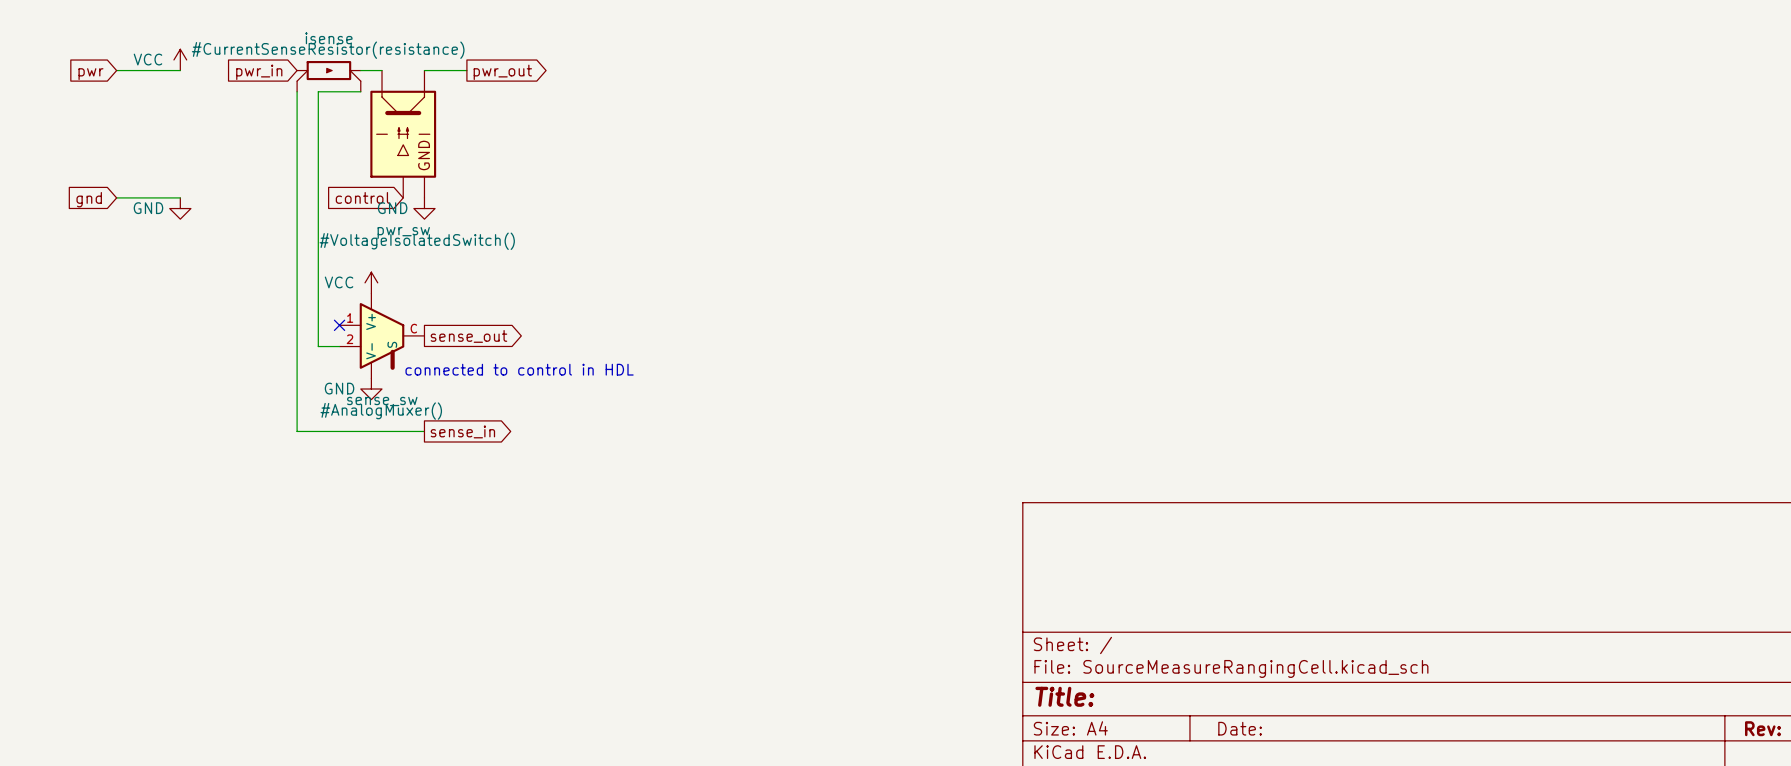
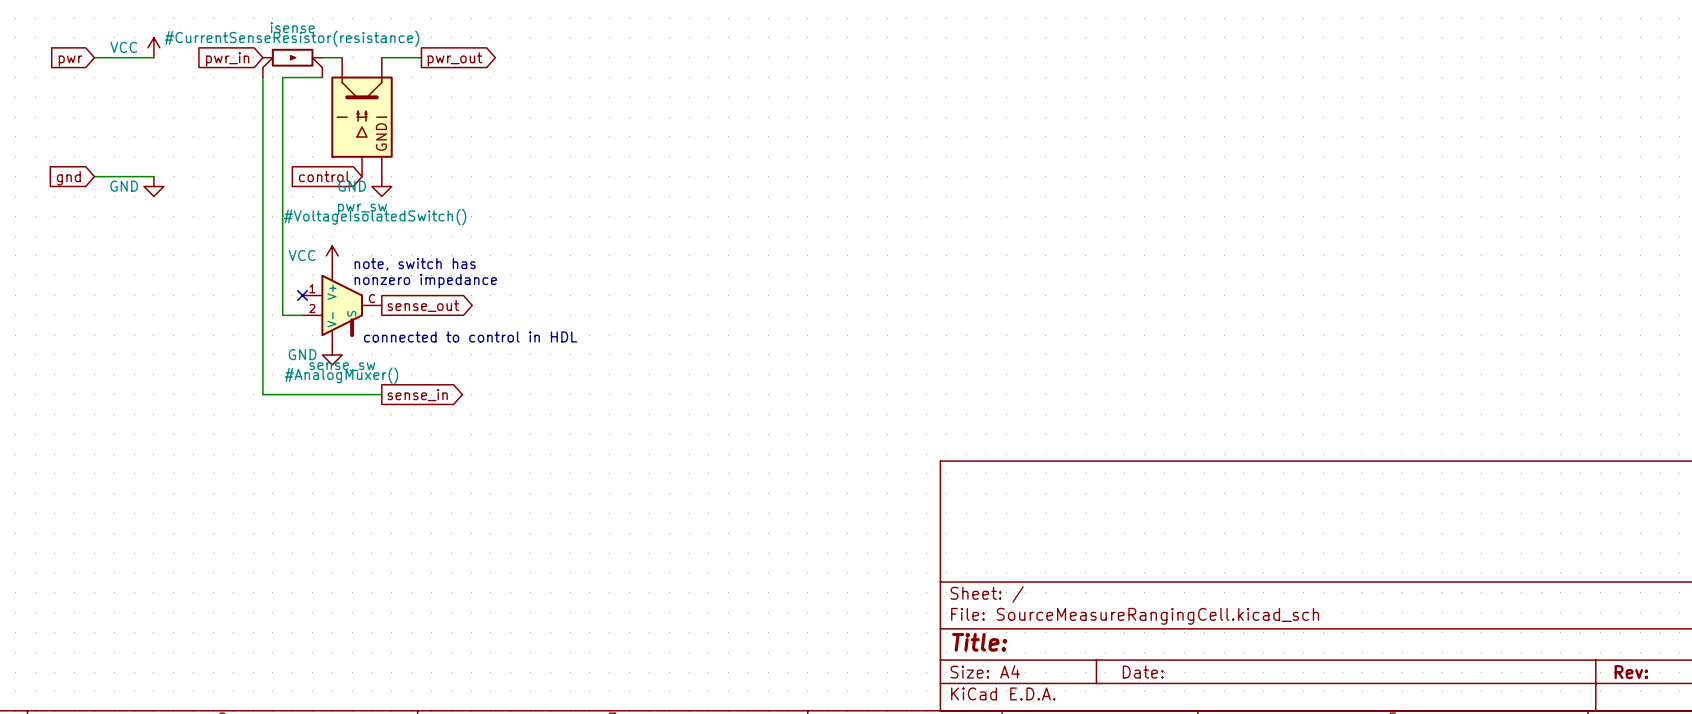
text: none -> note, switch has (415, 264)
text: none -> nonzero impedance (425, 281)

